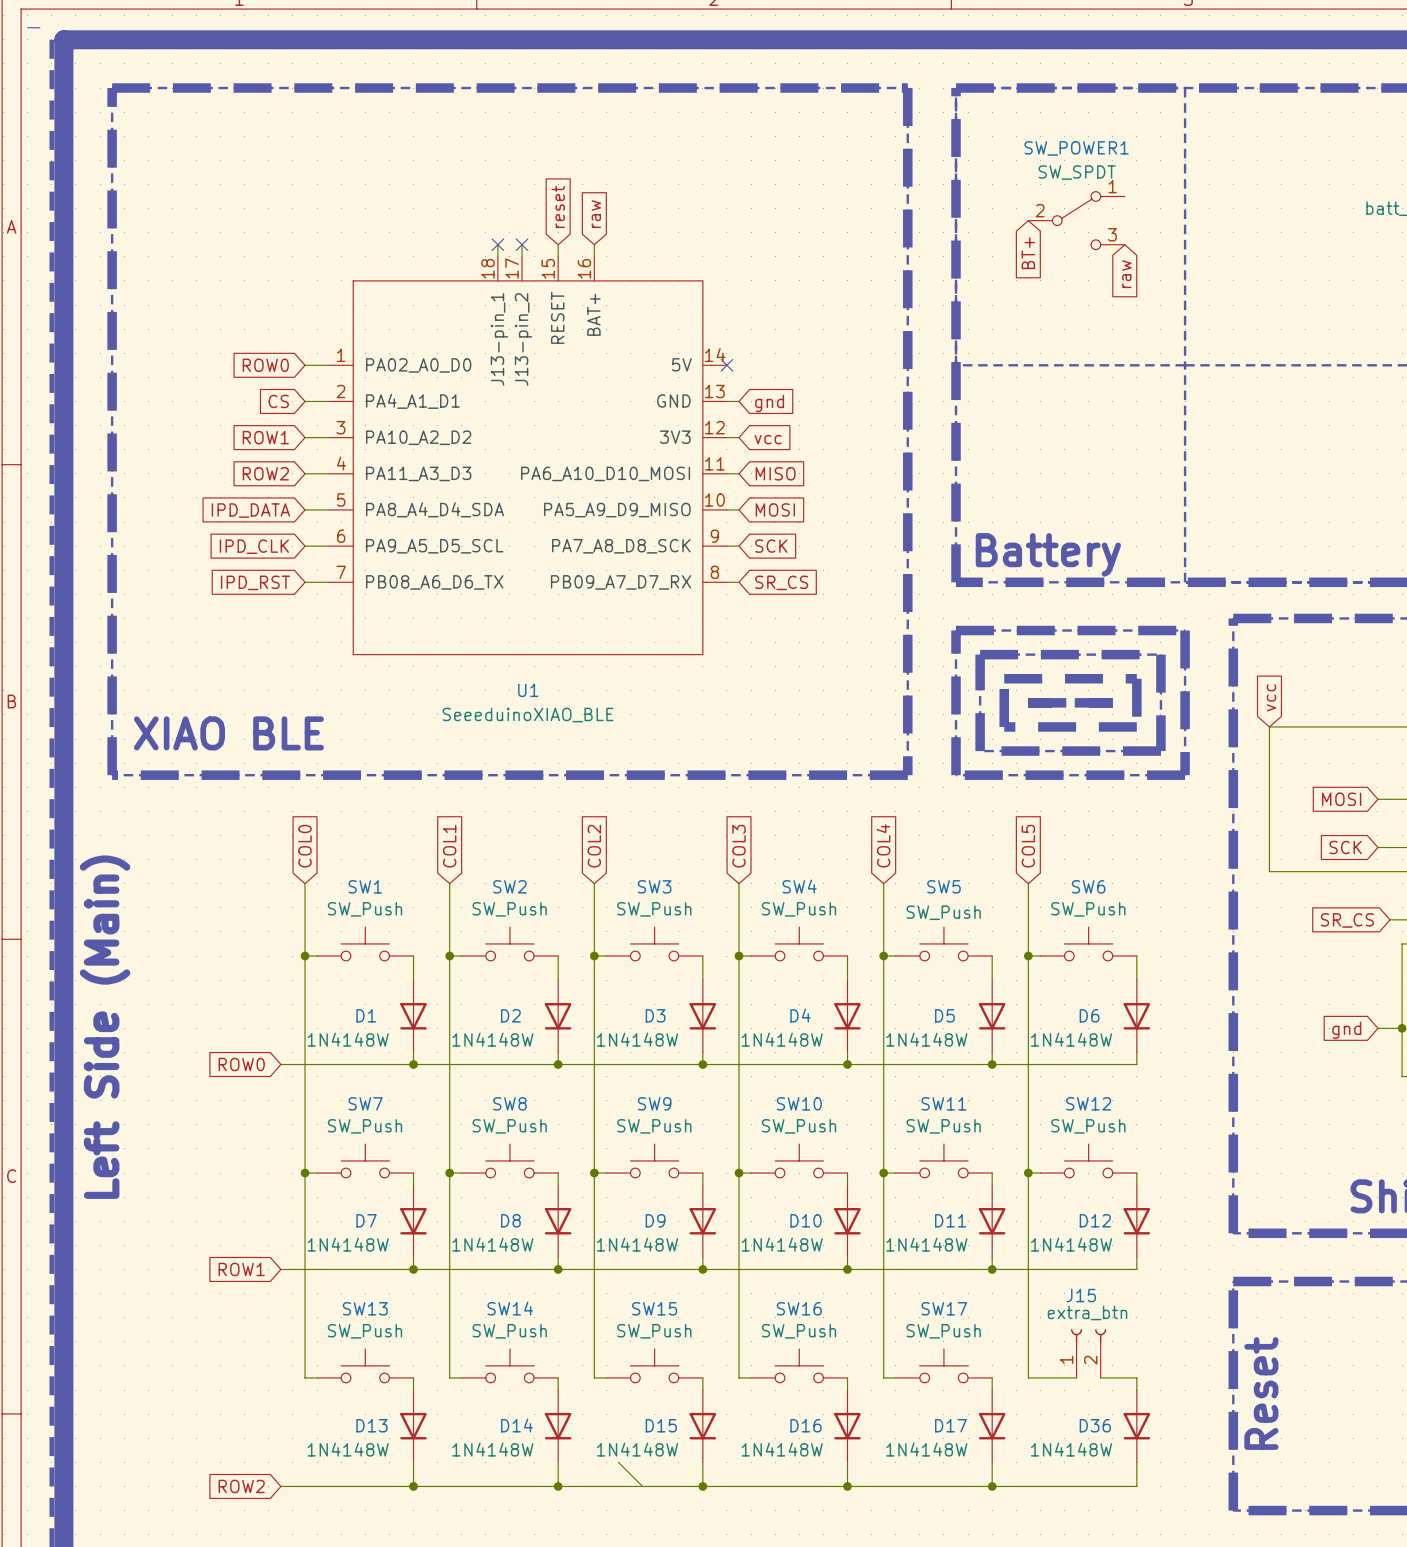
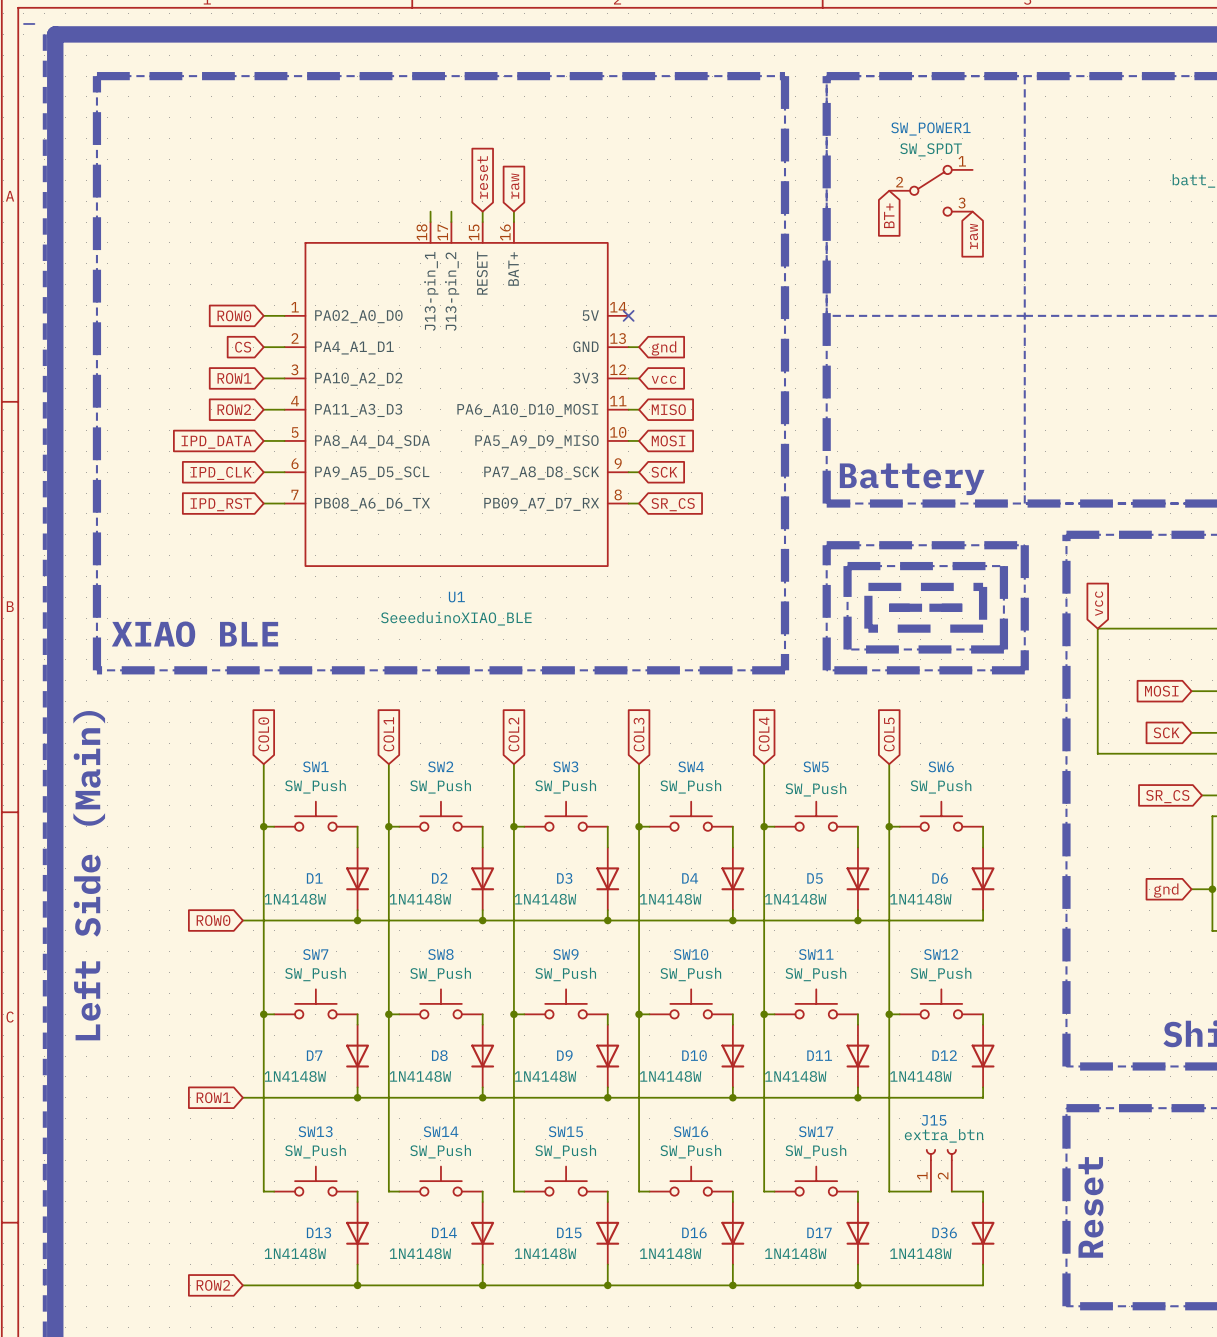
no-connect mark: (497, 244) -> none
no-connect mark: (522, 244) -> none
wire: (618, 1462) (642, 1486) -> none

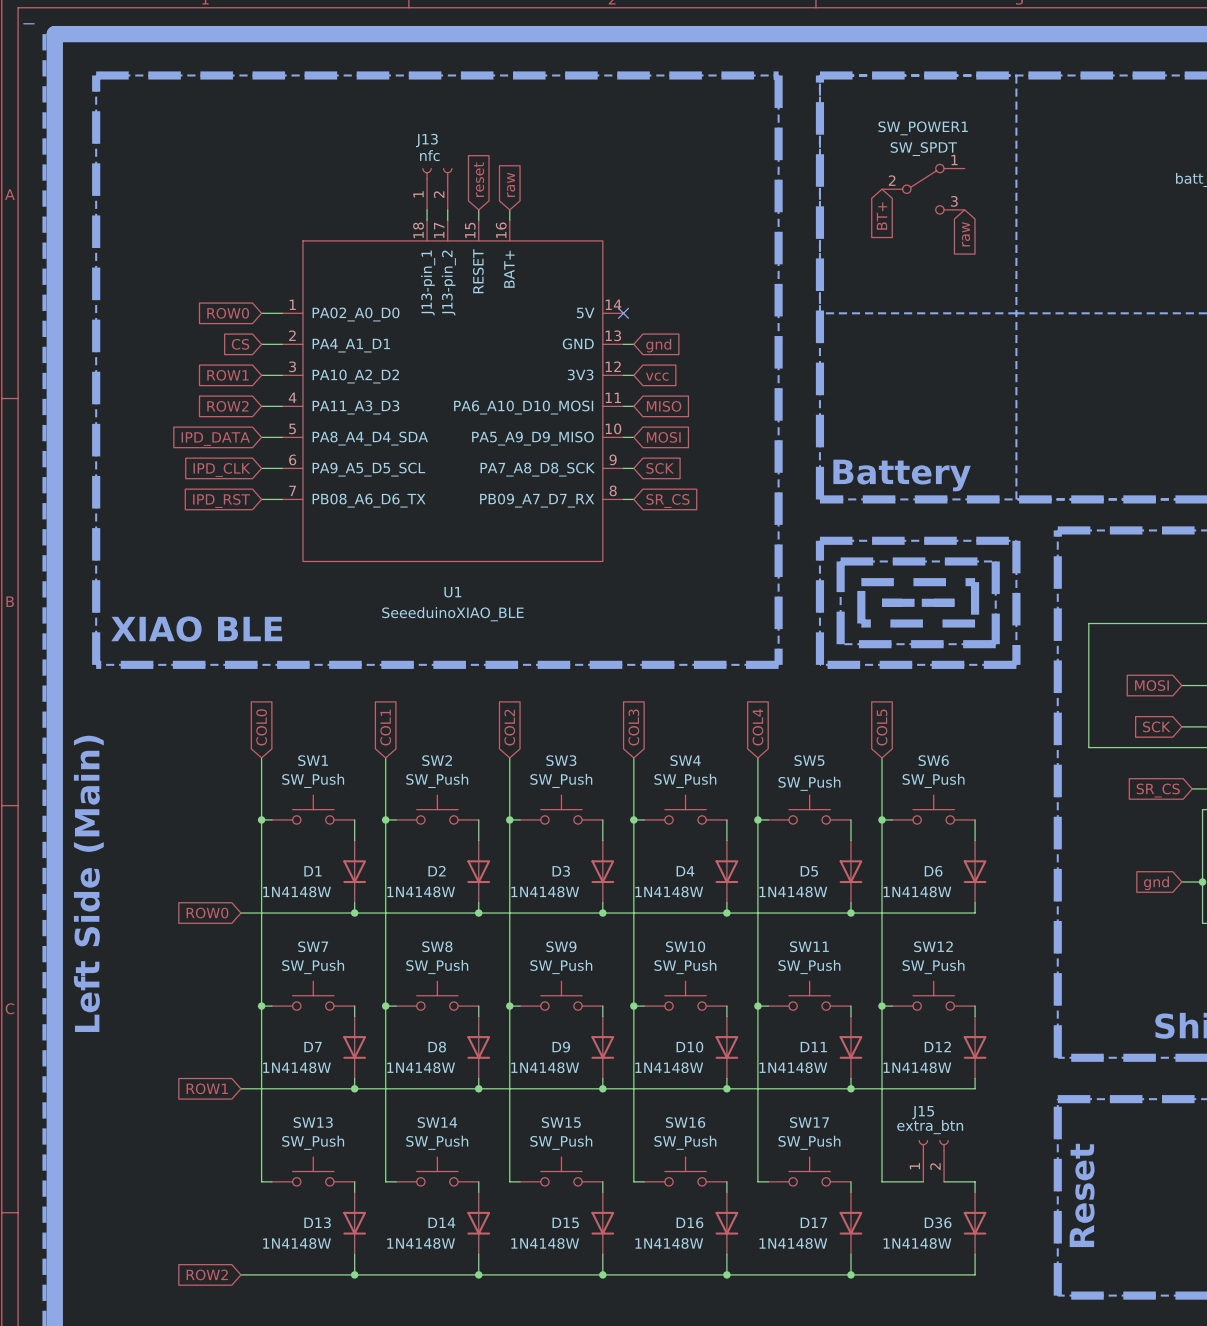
J13: none -> nfc (437, 188)
global label: vcc (1099, 603) -> none

